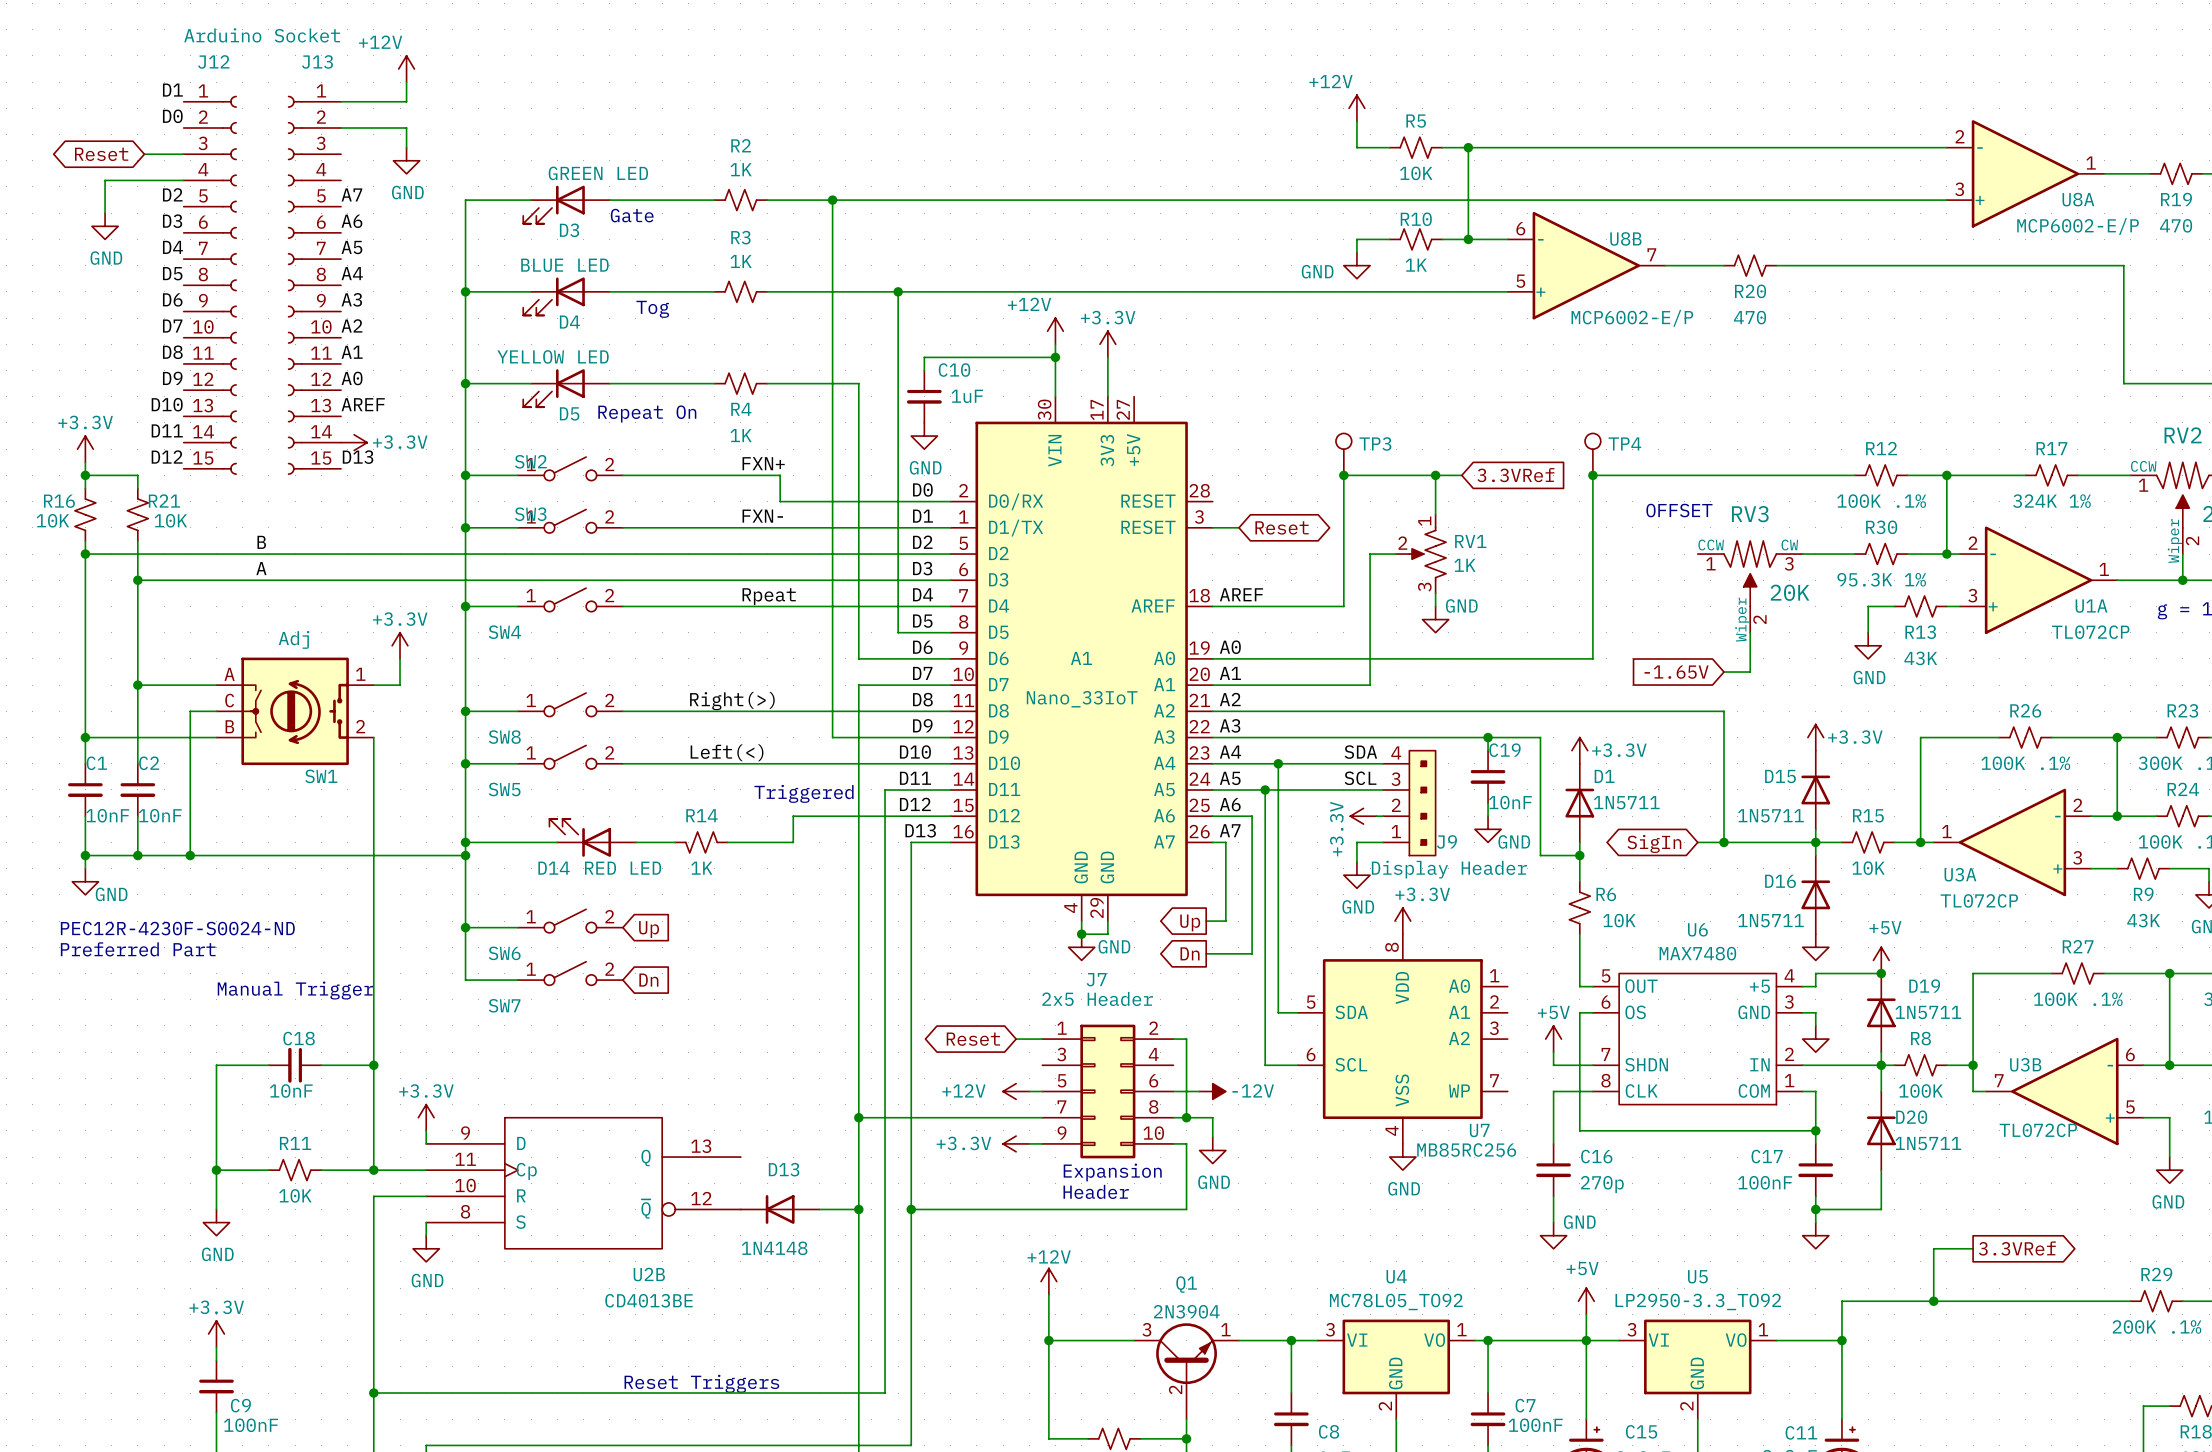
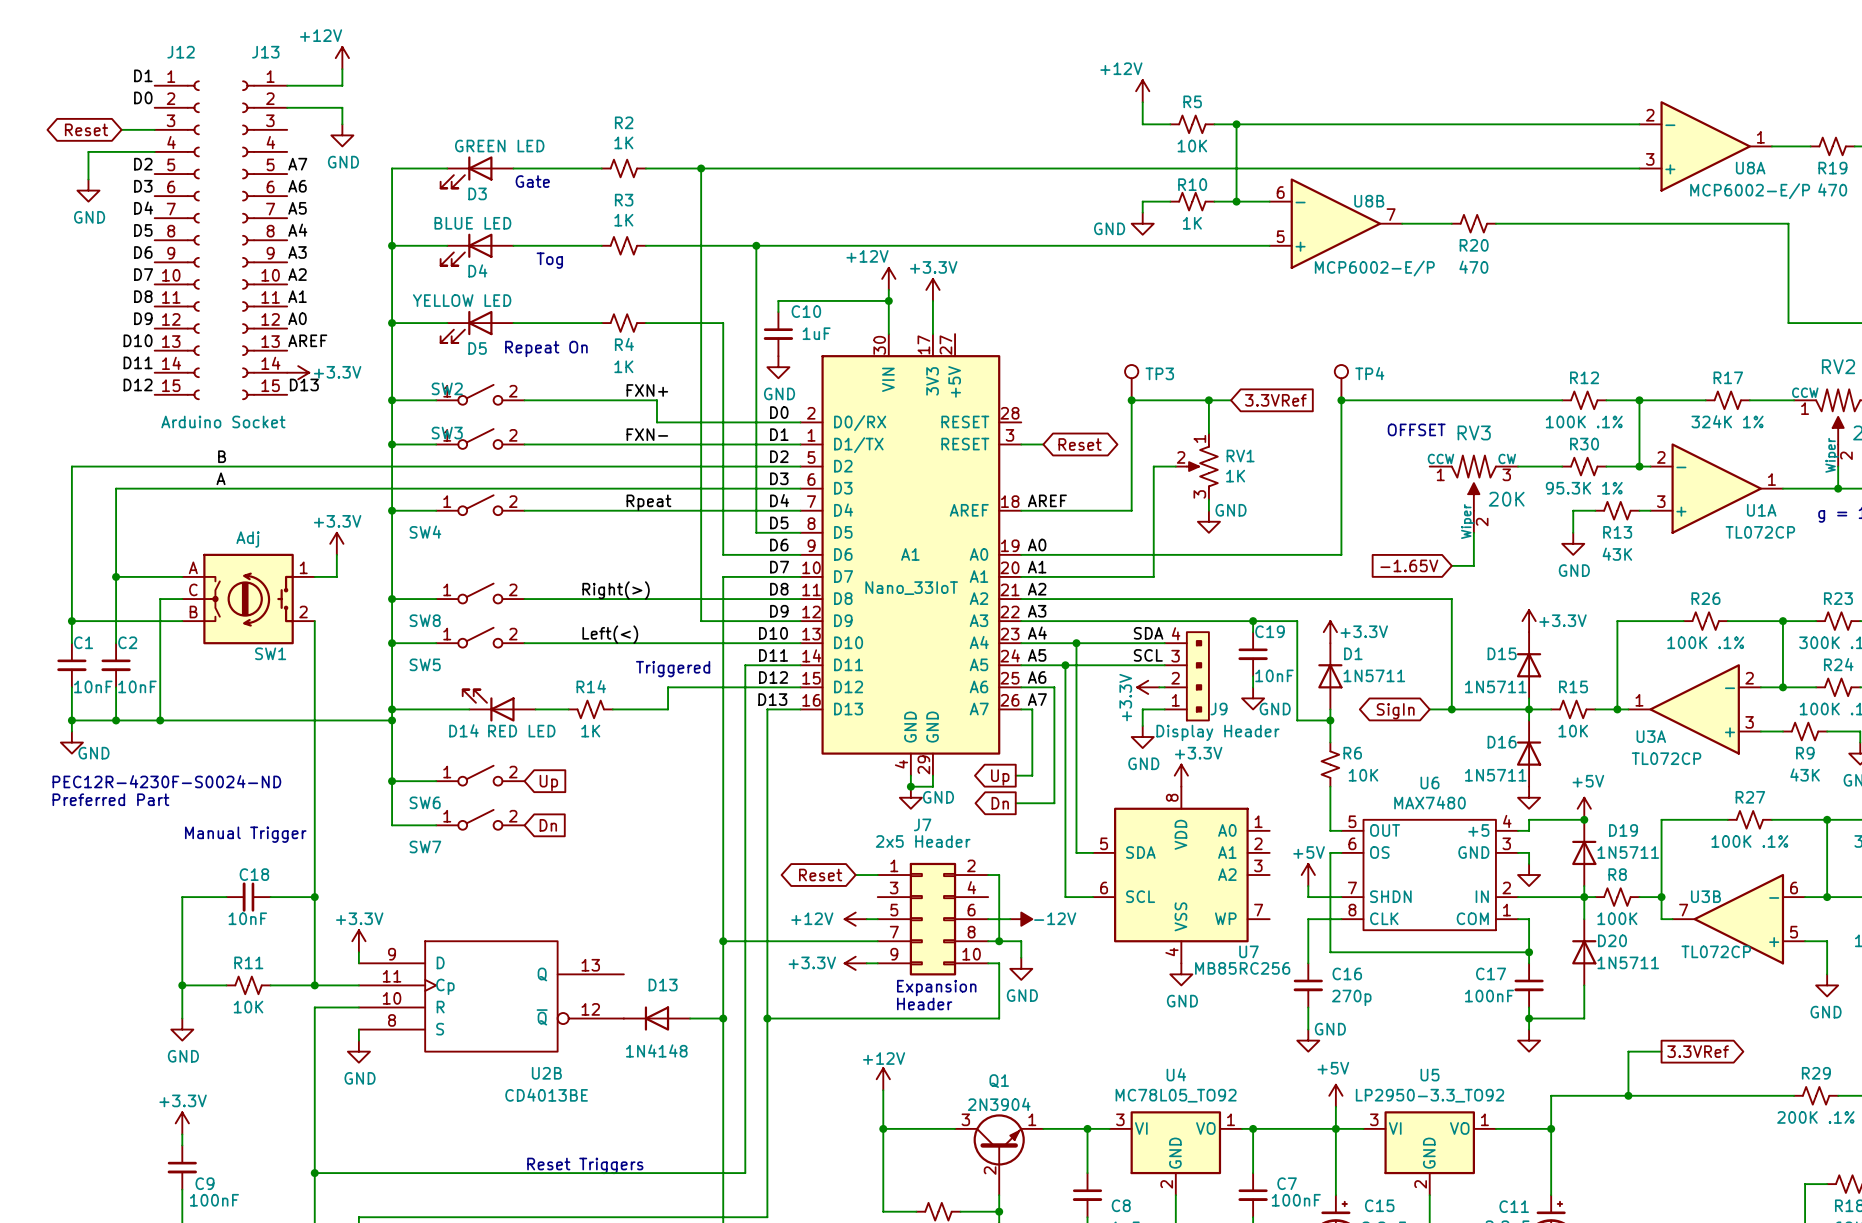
J12 value position: Arduino Socket (262, 35) -> Arduino Socket (223, 421)
power symbol: +3.3V (85, 449) -> none
wire: (85, 462) (85, 488) -> none
wire: (85, 475) (137, 475) (137, 488) -> none
junction: (85, 475) -> none
R16: 10K (85, 514) -> none
R21: 10K (137, 514) -> none
wire: (85, 540) (85, 554) -> none
wire: (137, 540) (137, 580) -> none
junction: (85, 554) -> none
junction: (137, 580) -> none

